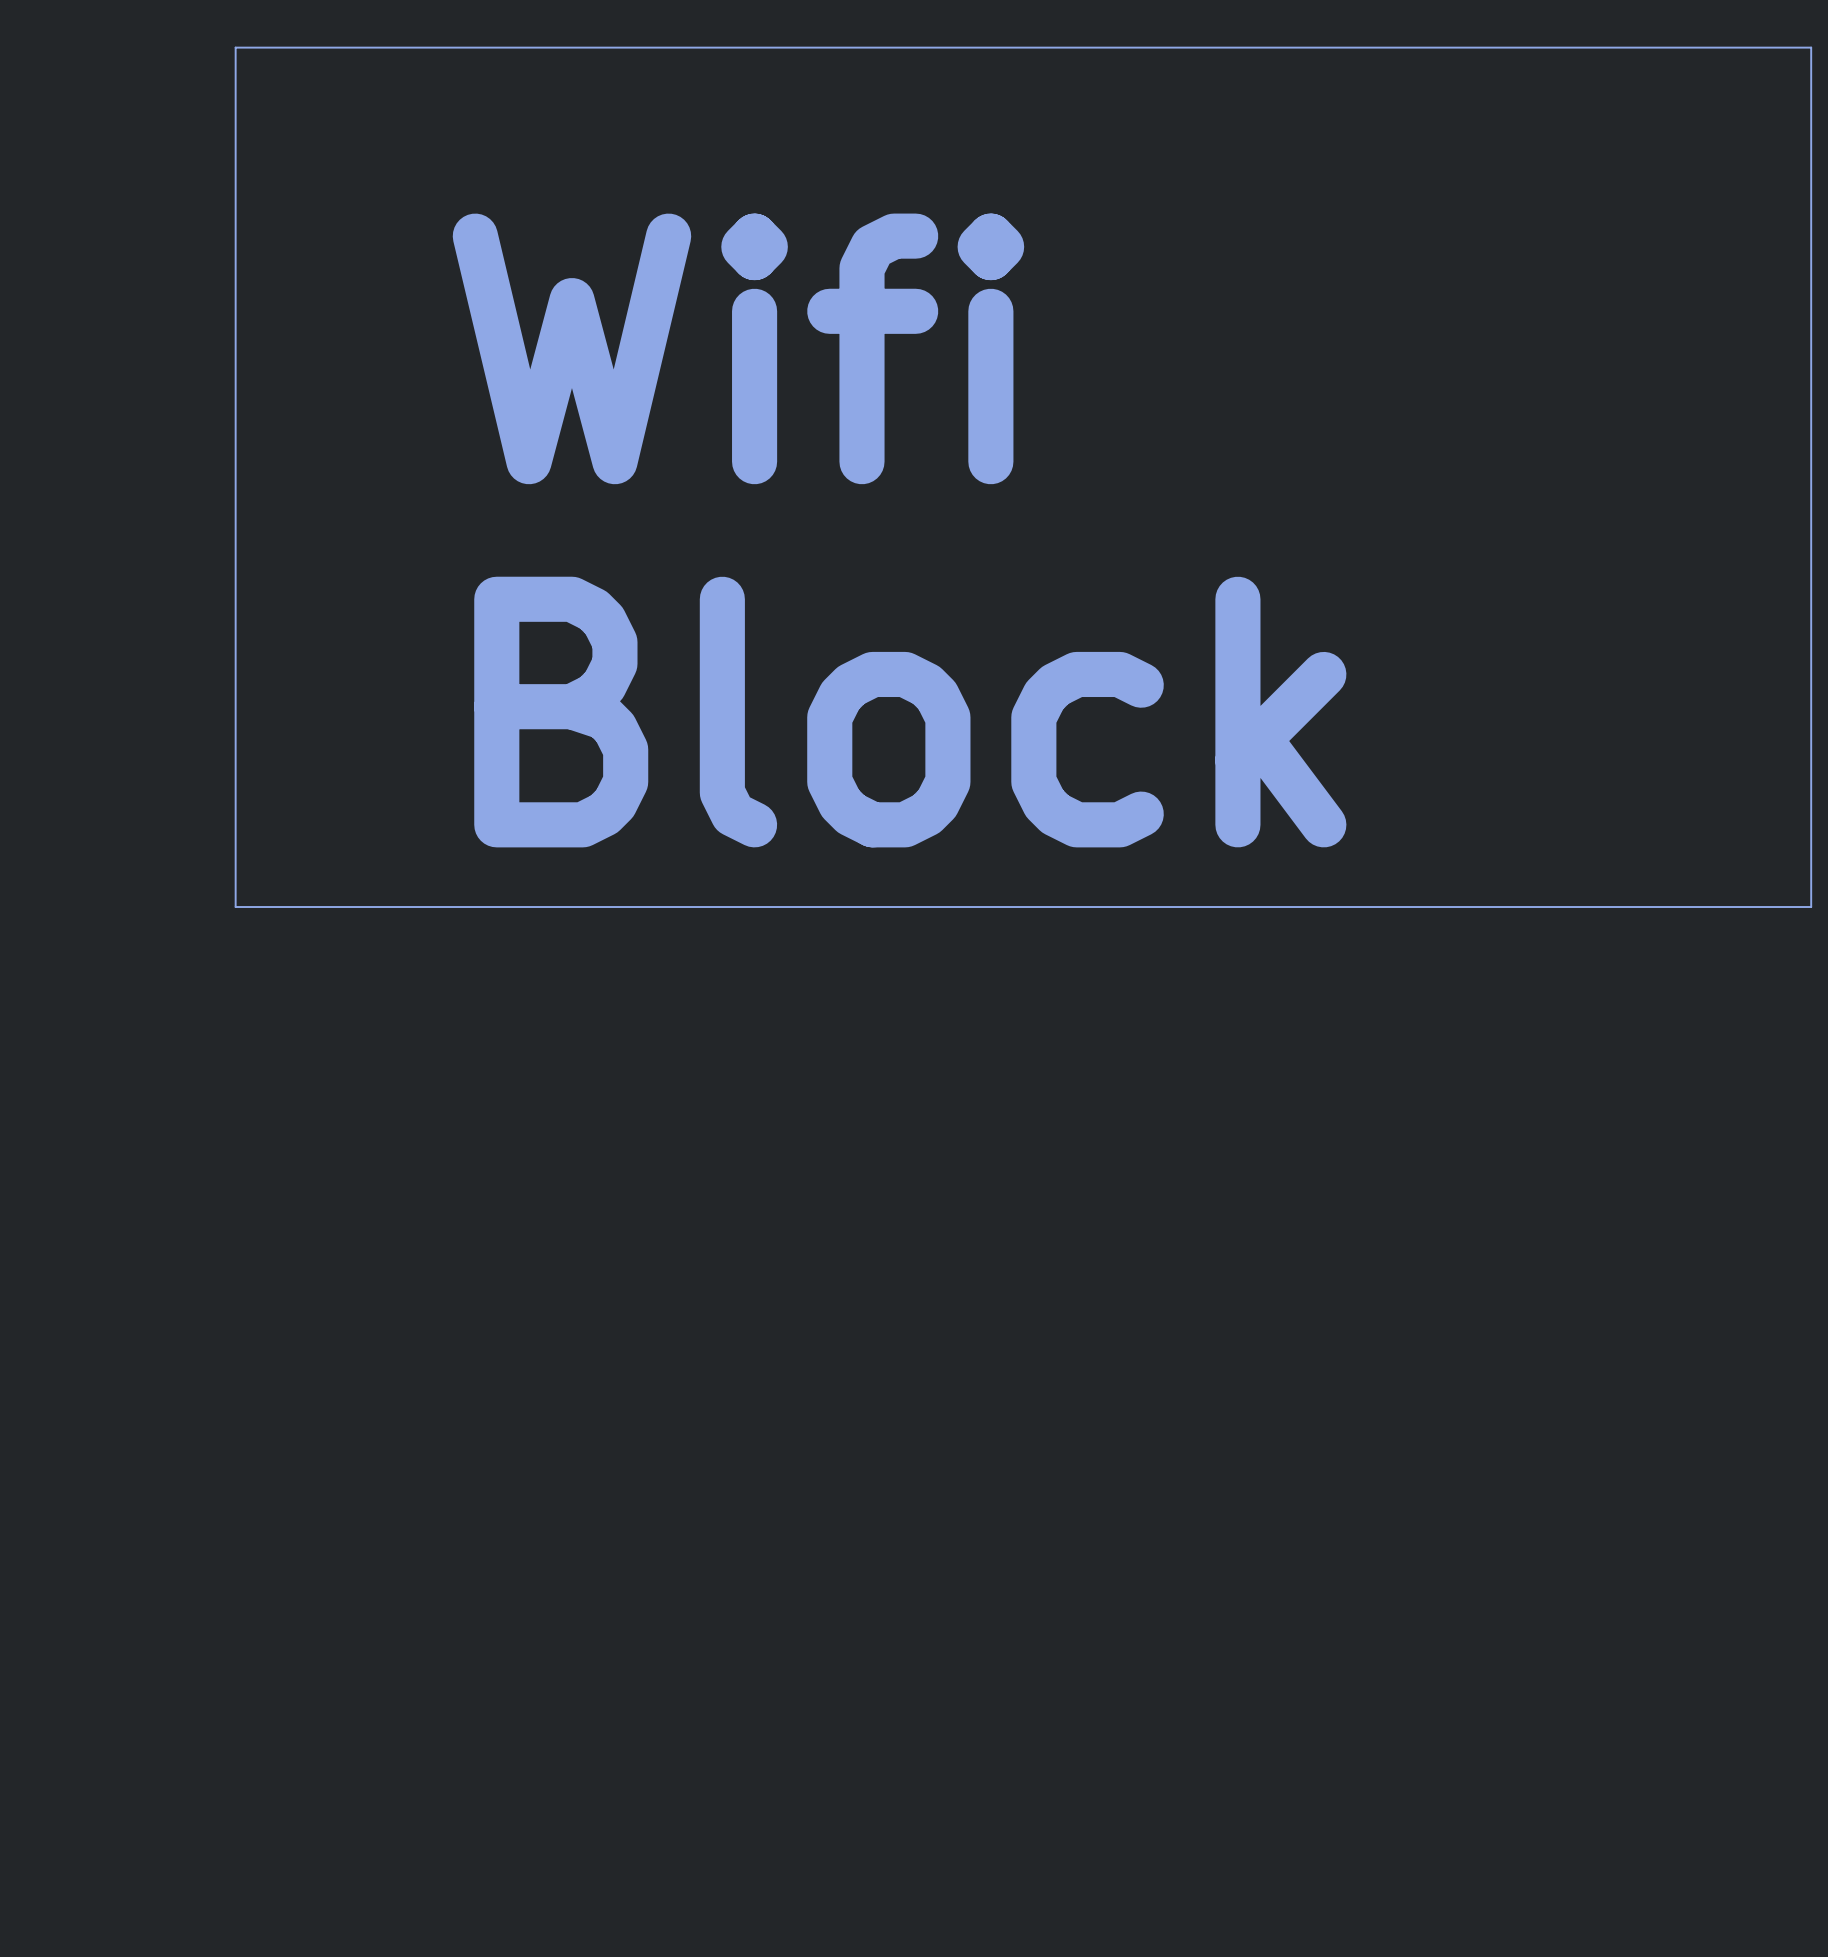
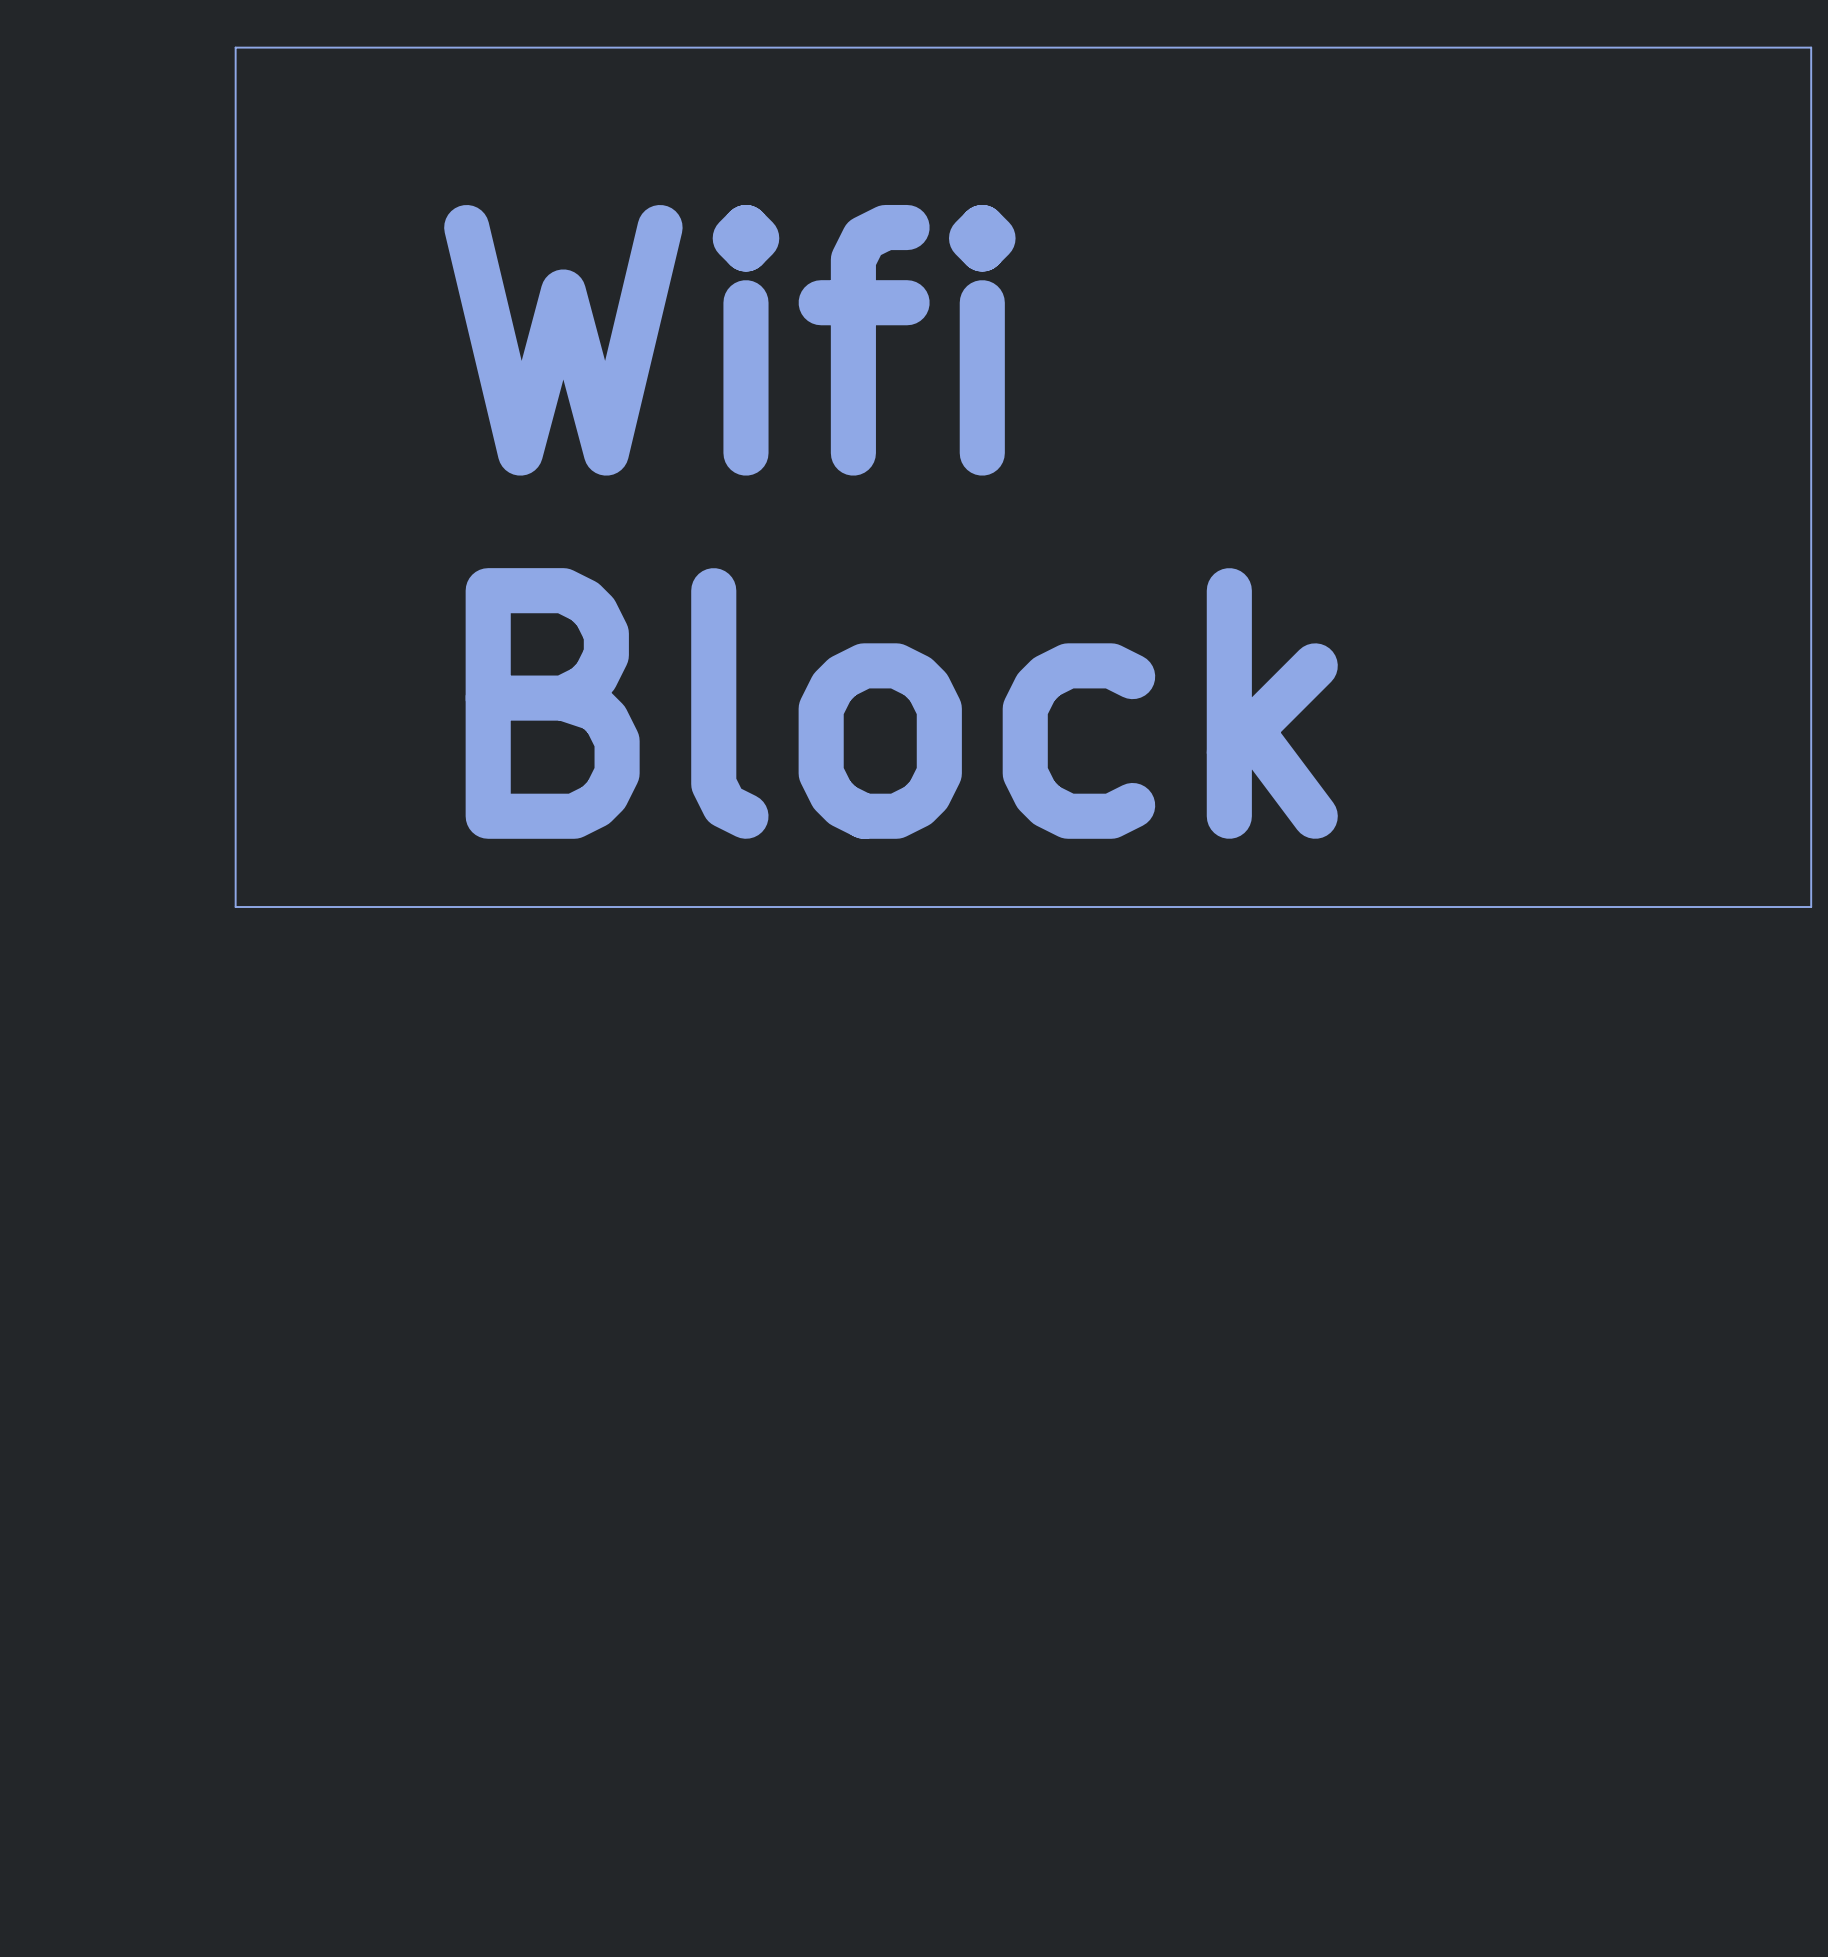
text position: Wifi (738, 348) -> Wifi (729, 340)
text position: Block (910, 712) -> Block (901, 703)

